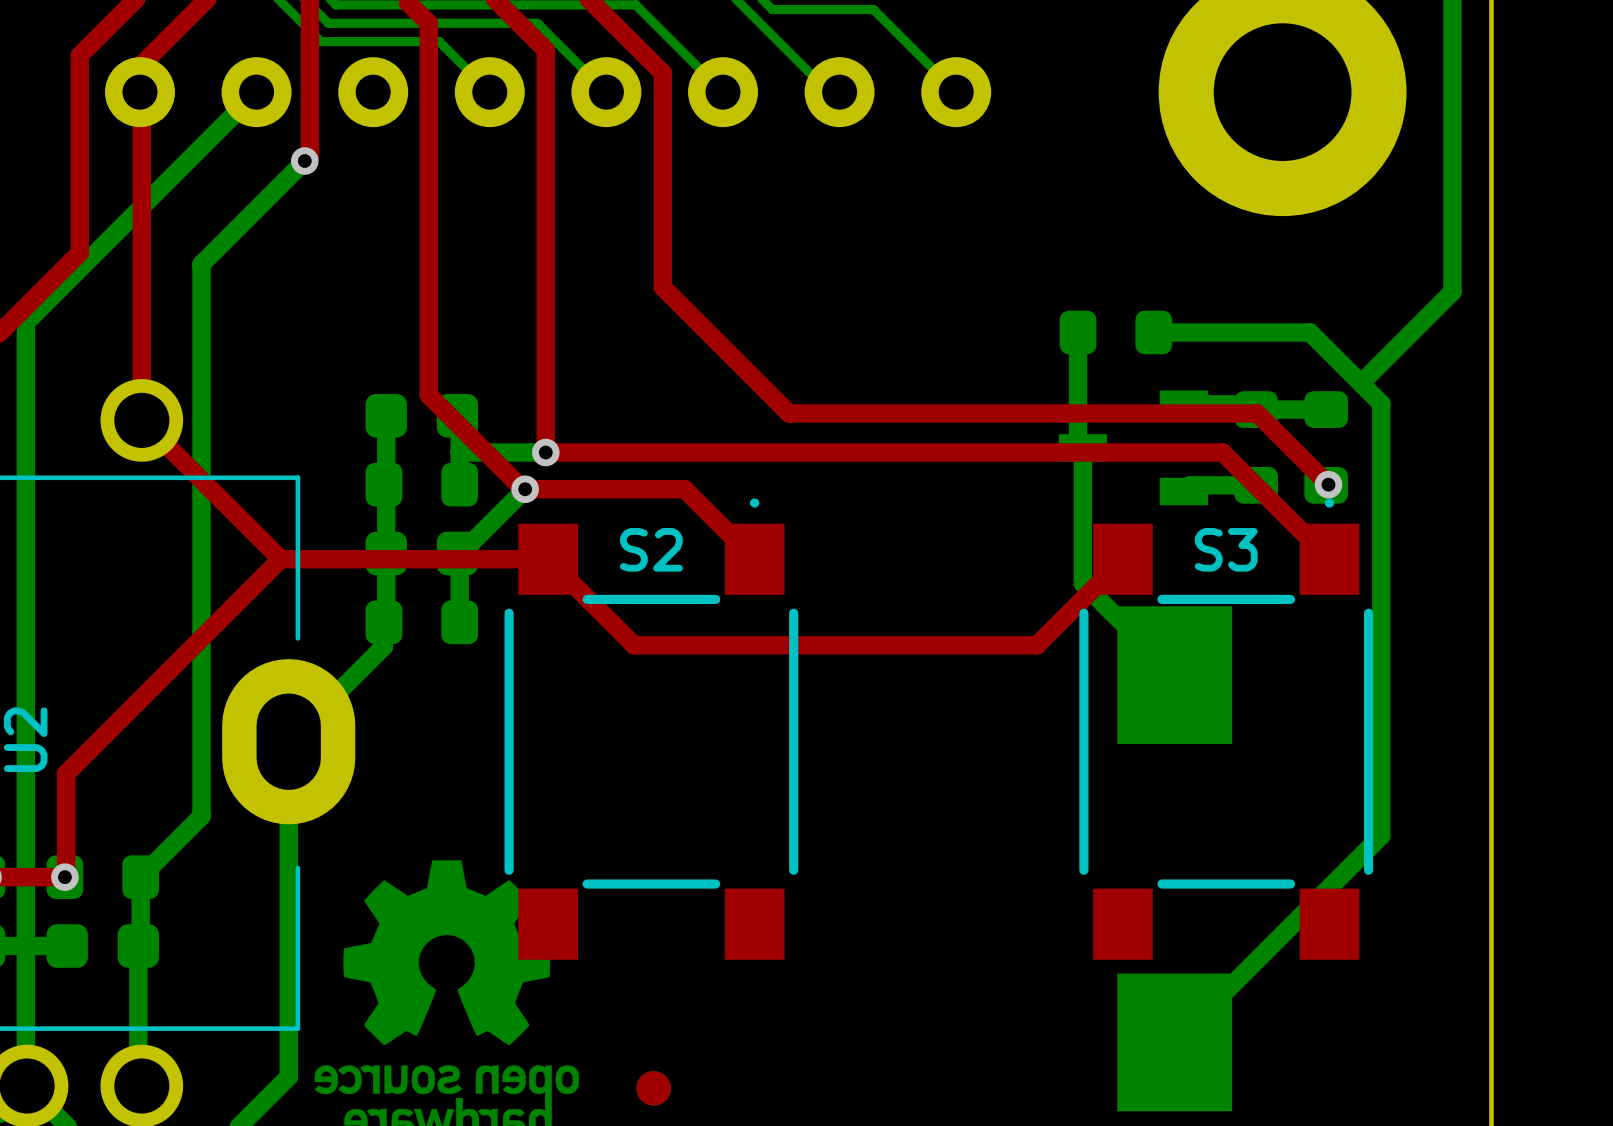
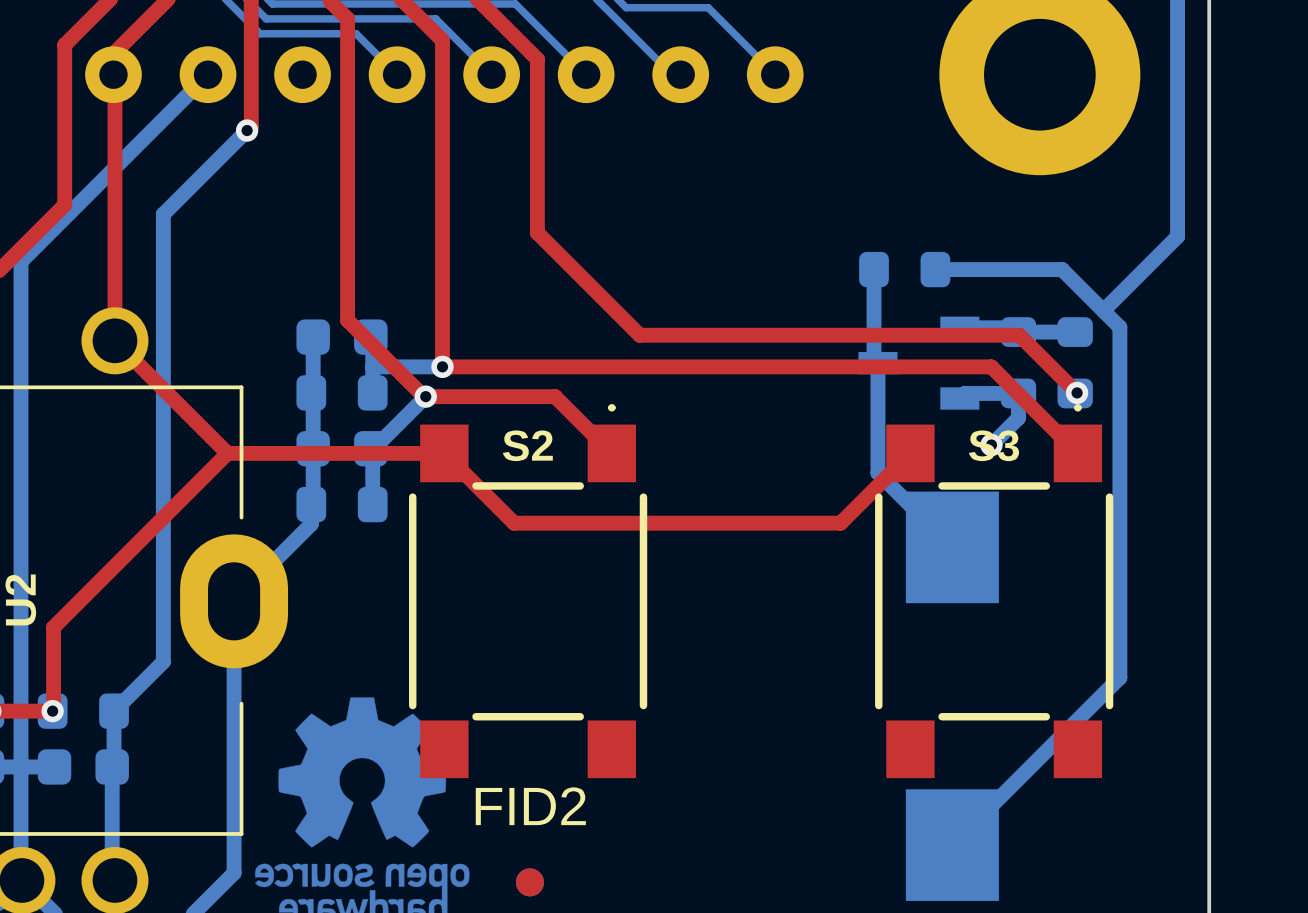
bottom track: none -> (1018, 393) (1018, 418) (991, 445)
via: none -> (991, 445)
FID2 name: none -> FID2 (530, 806)

